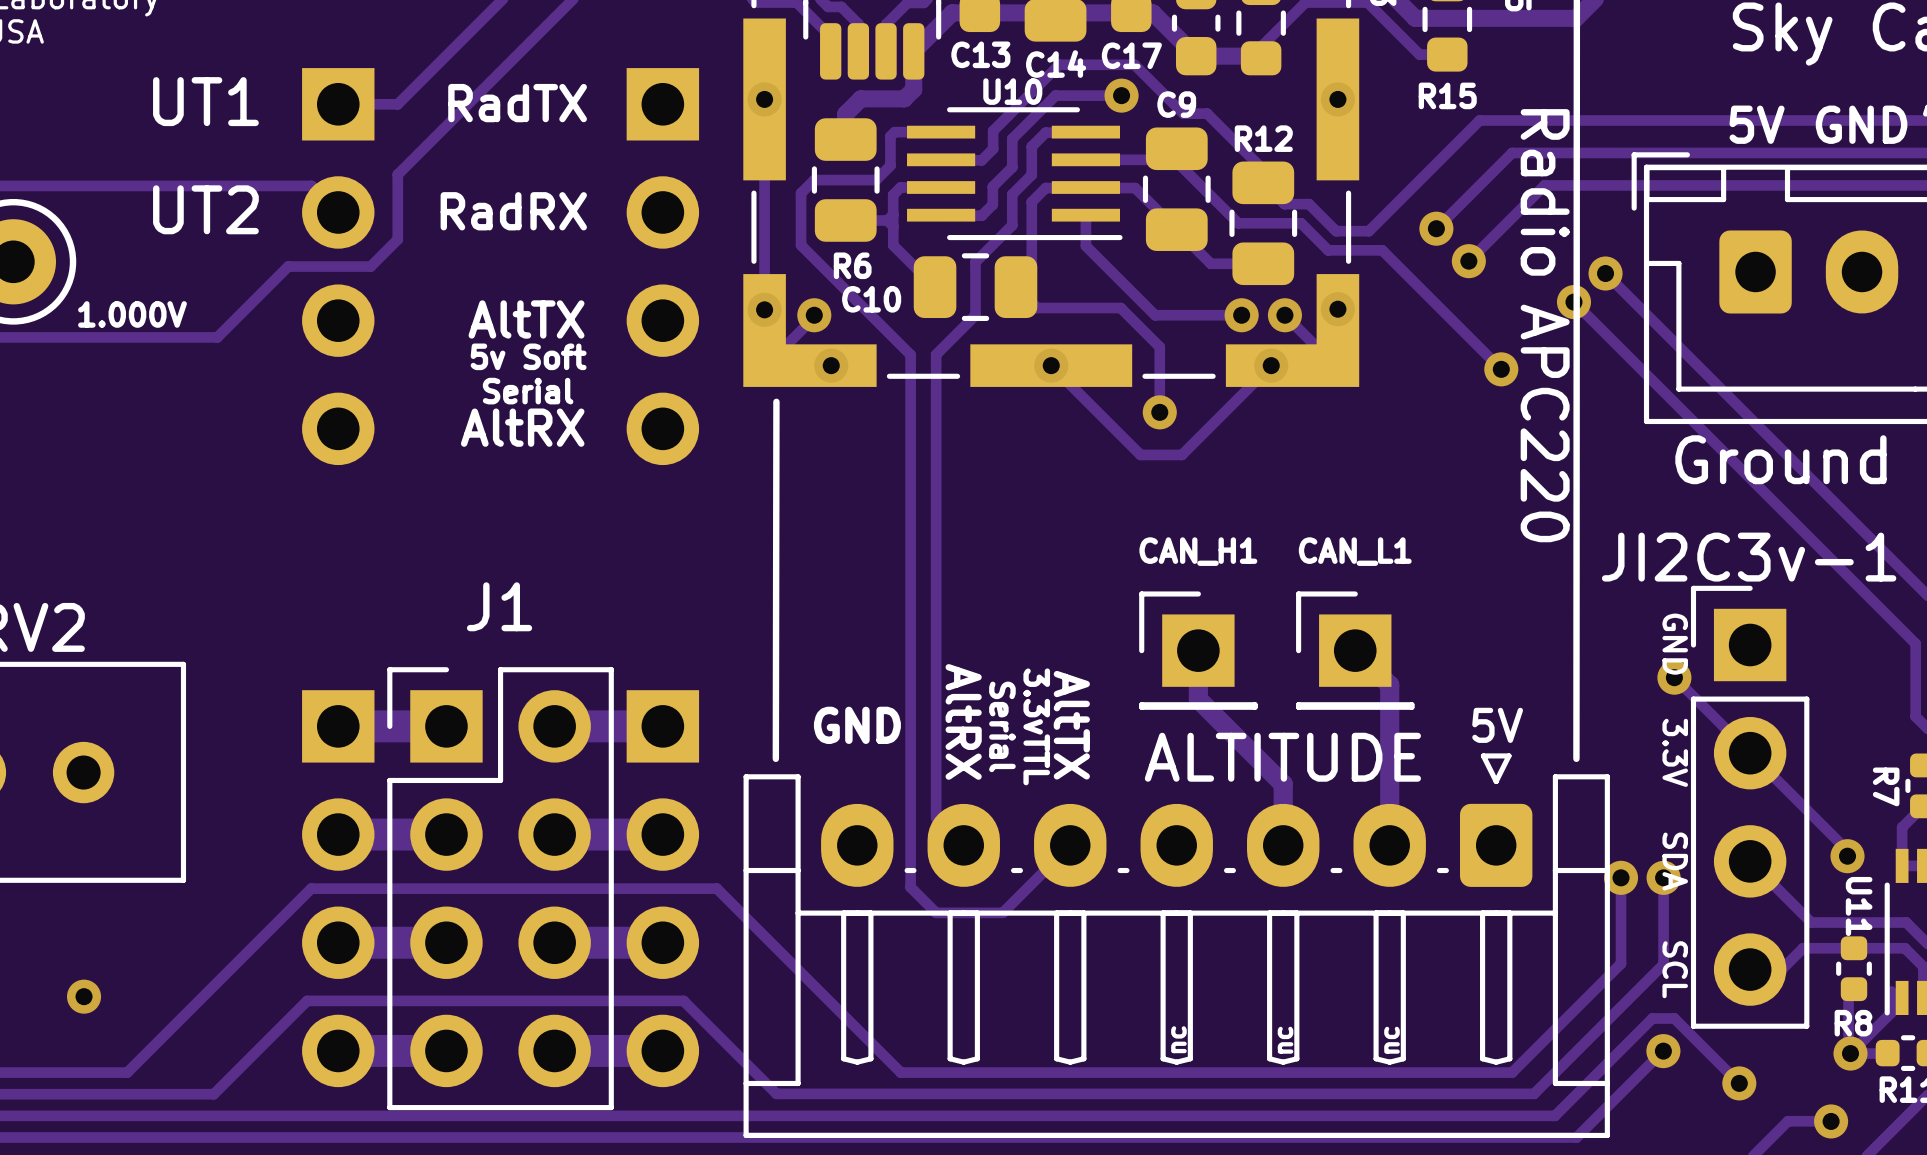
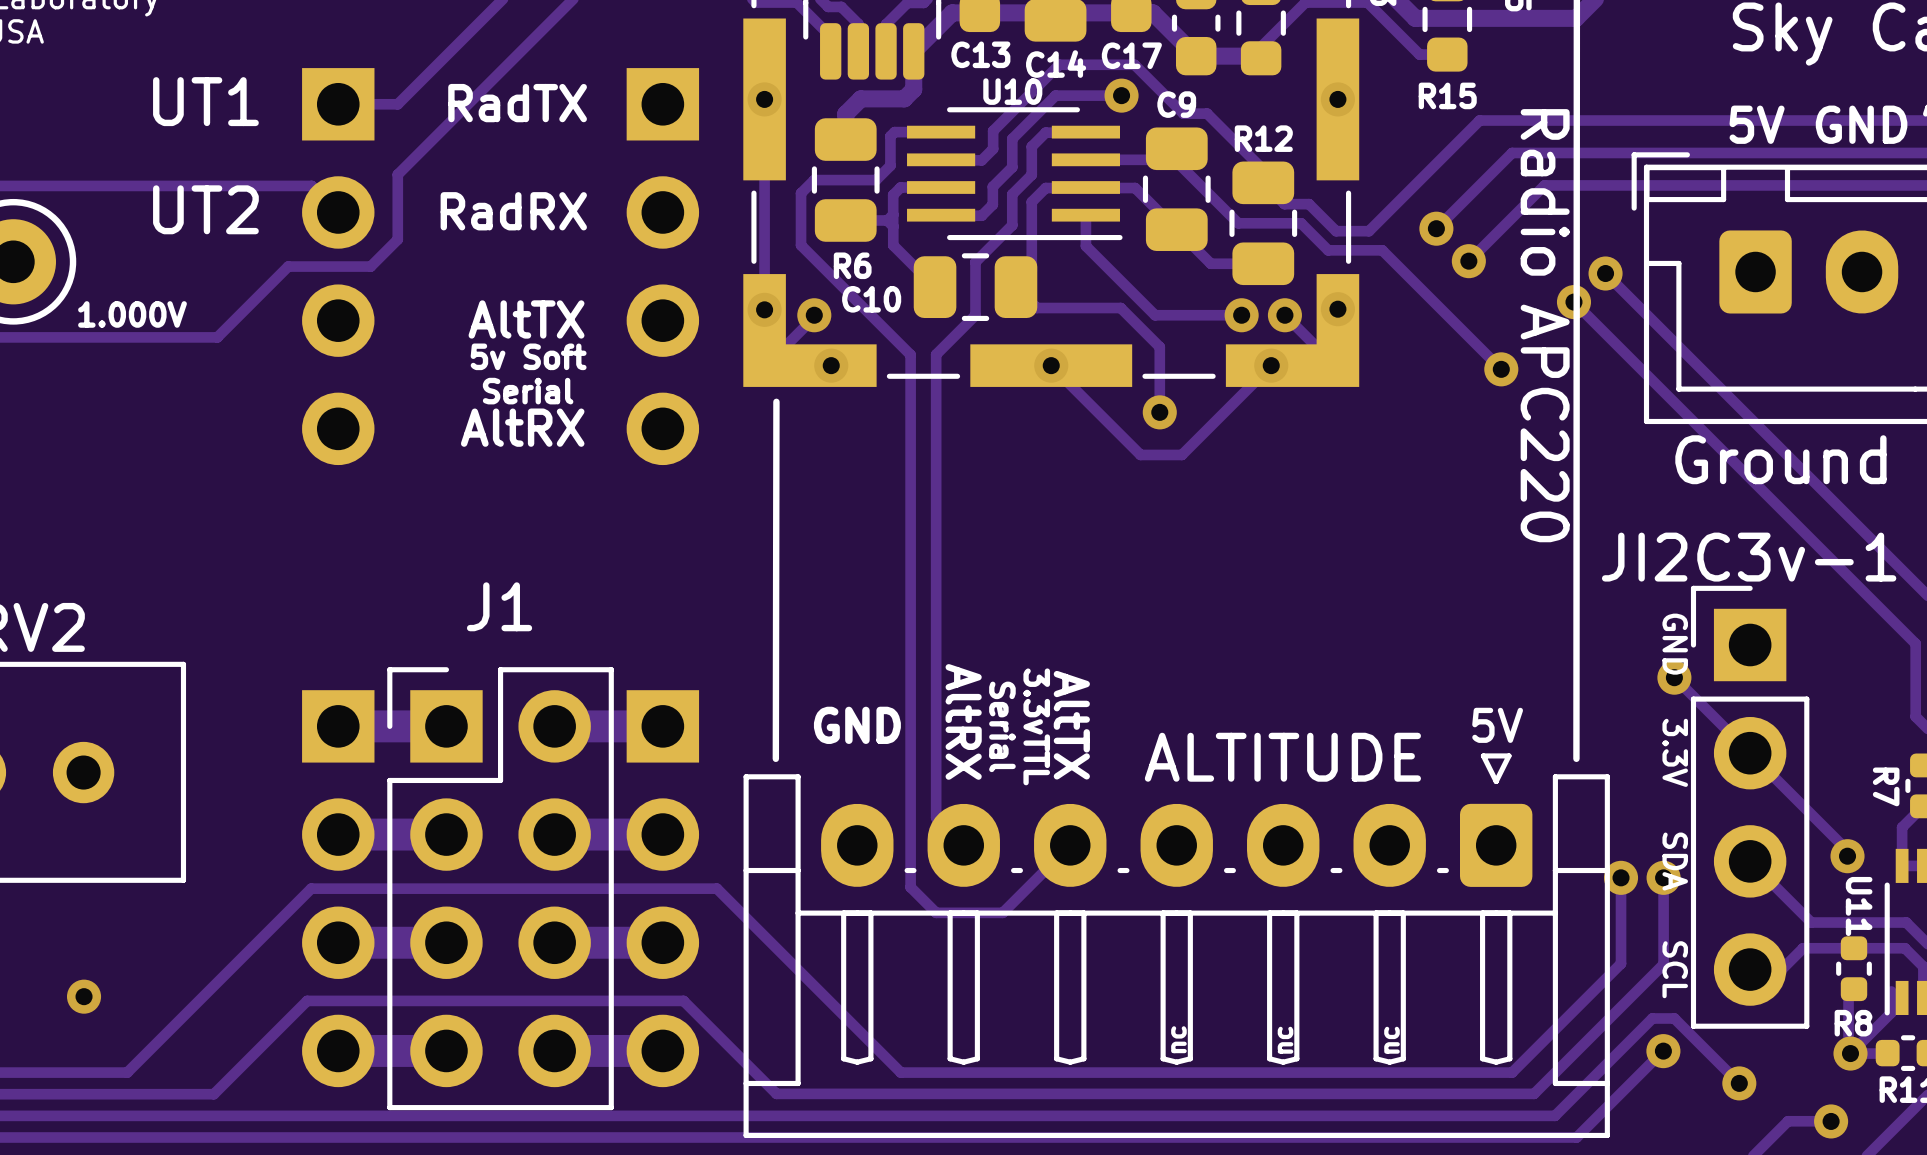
track: (1198, 650) (1198, 699) (1283, 784) (1283, 845) -> none
CAN_H1: (1198, 650) -> none
track: (1355, 650) (1389, 685) (1389, 845) -> none
CAN_L1: (1355, 650) -> none

